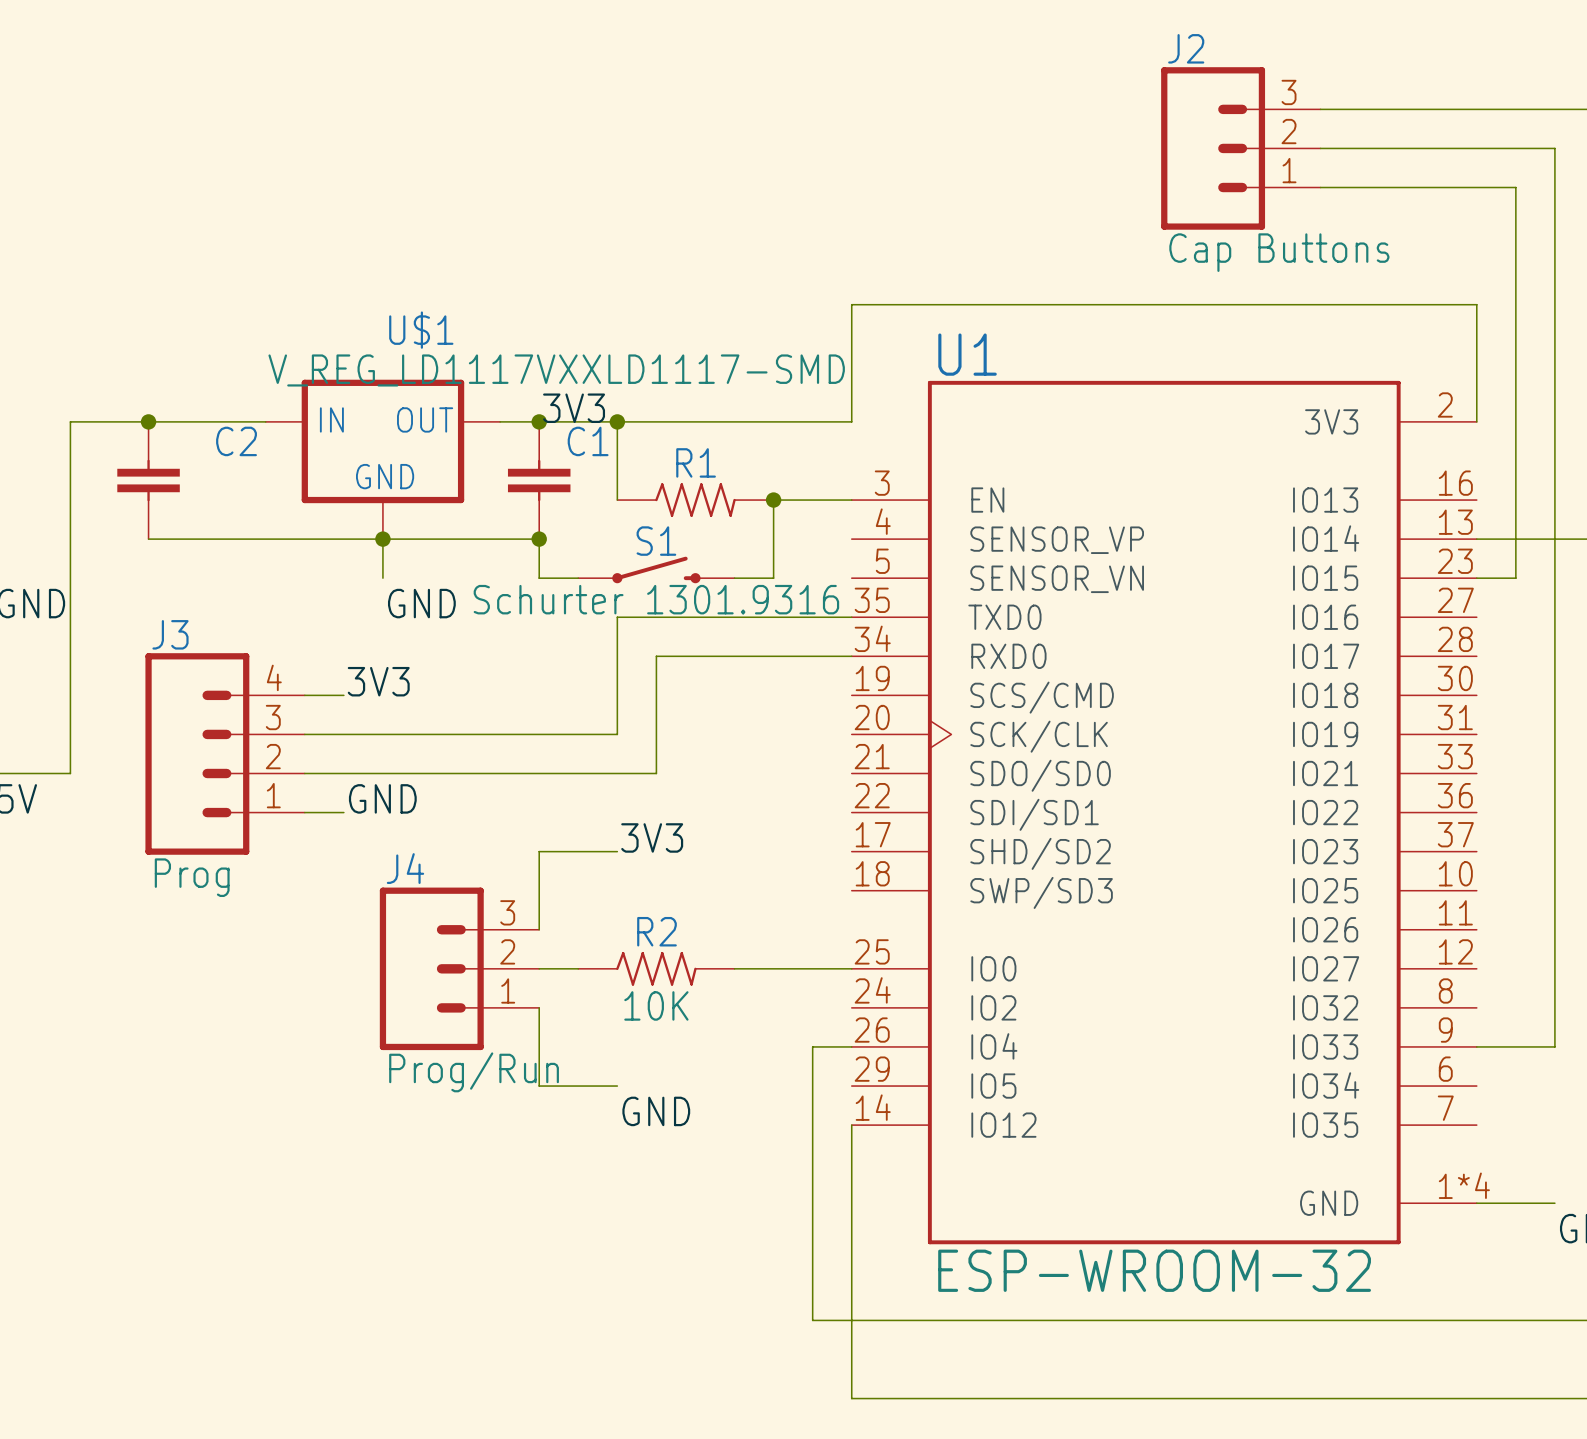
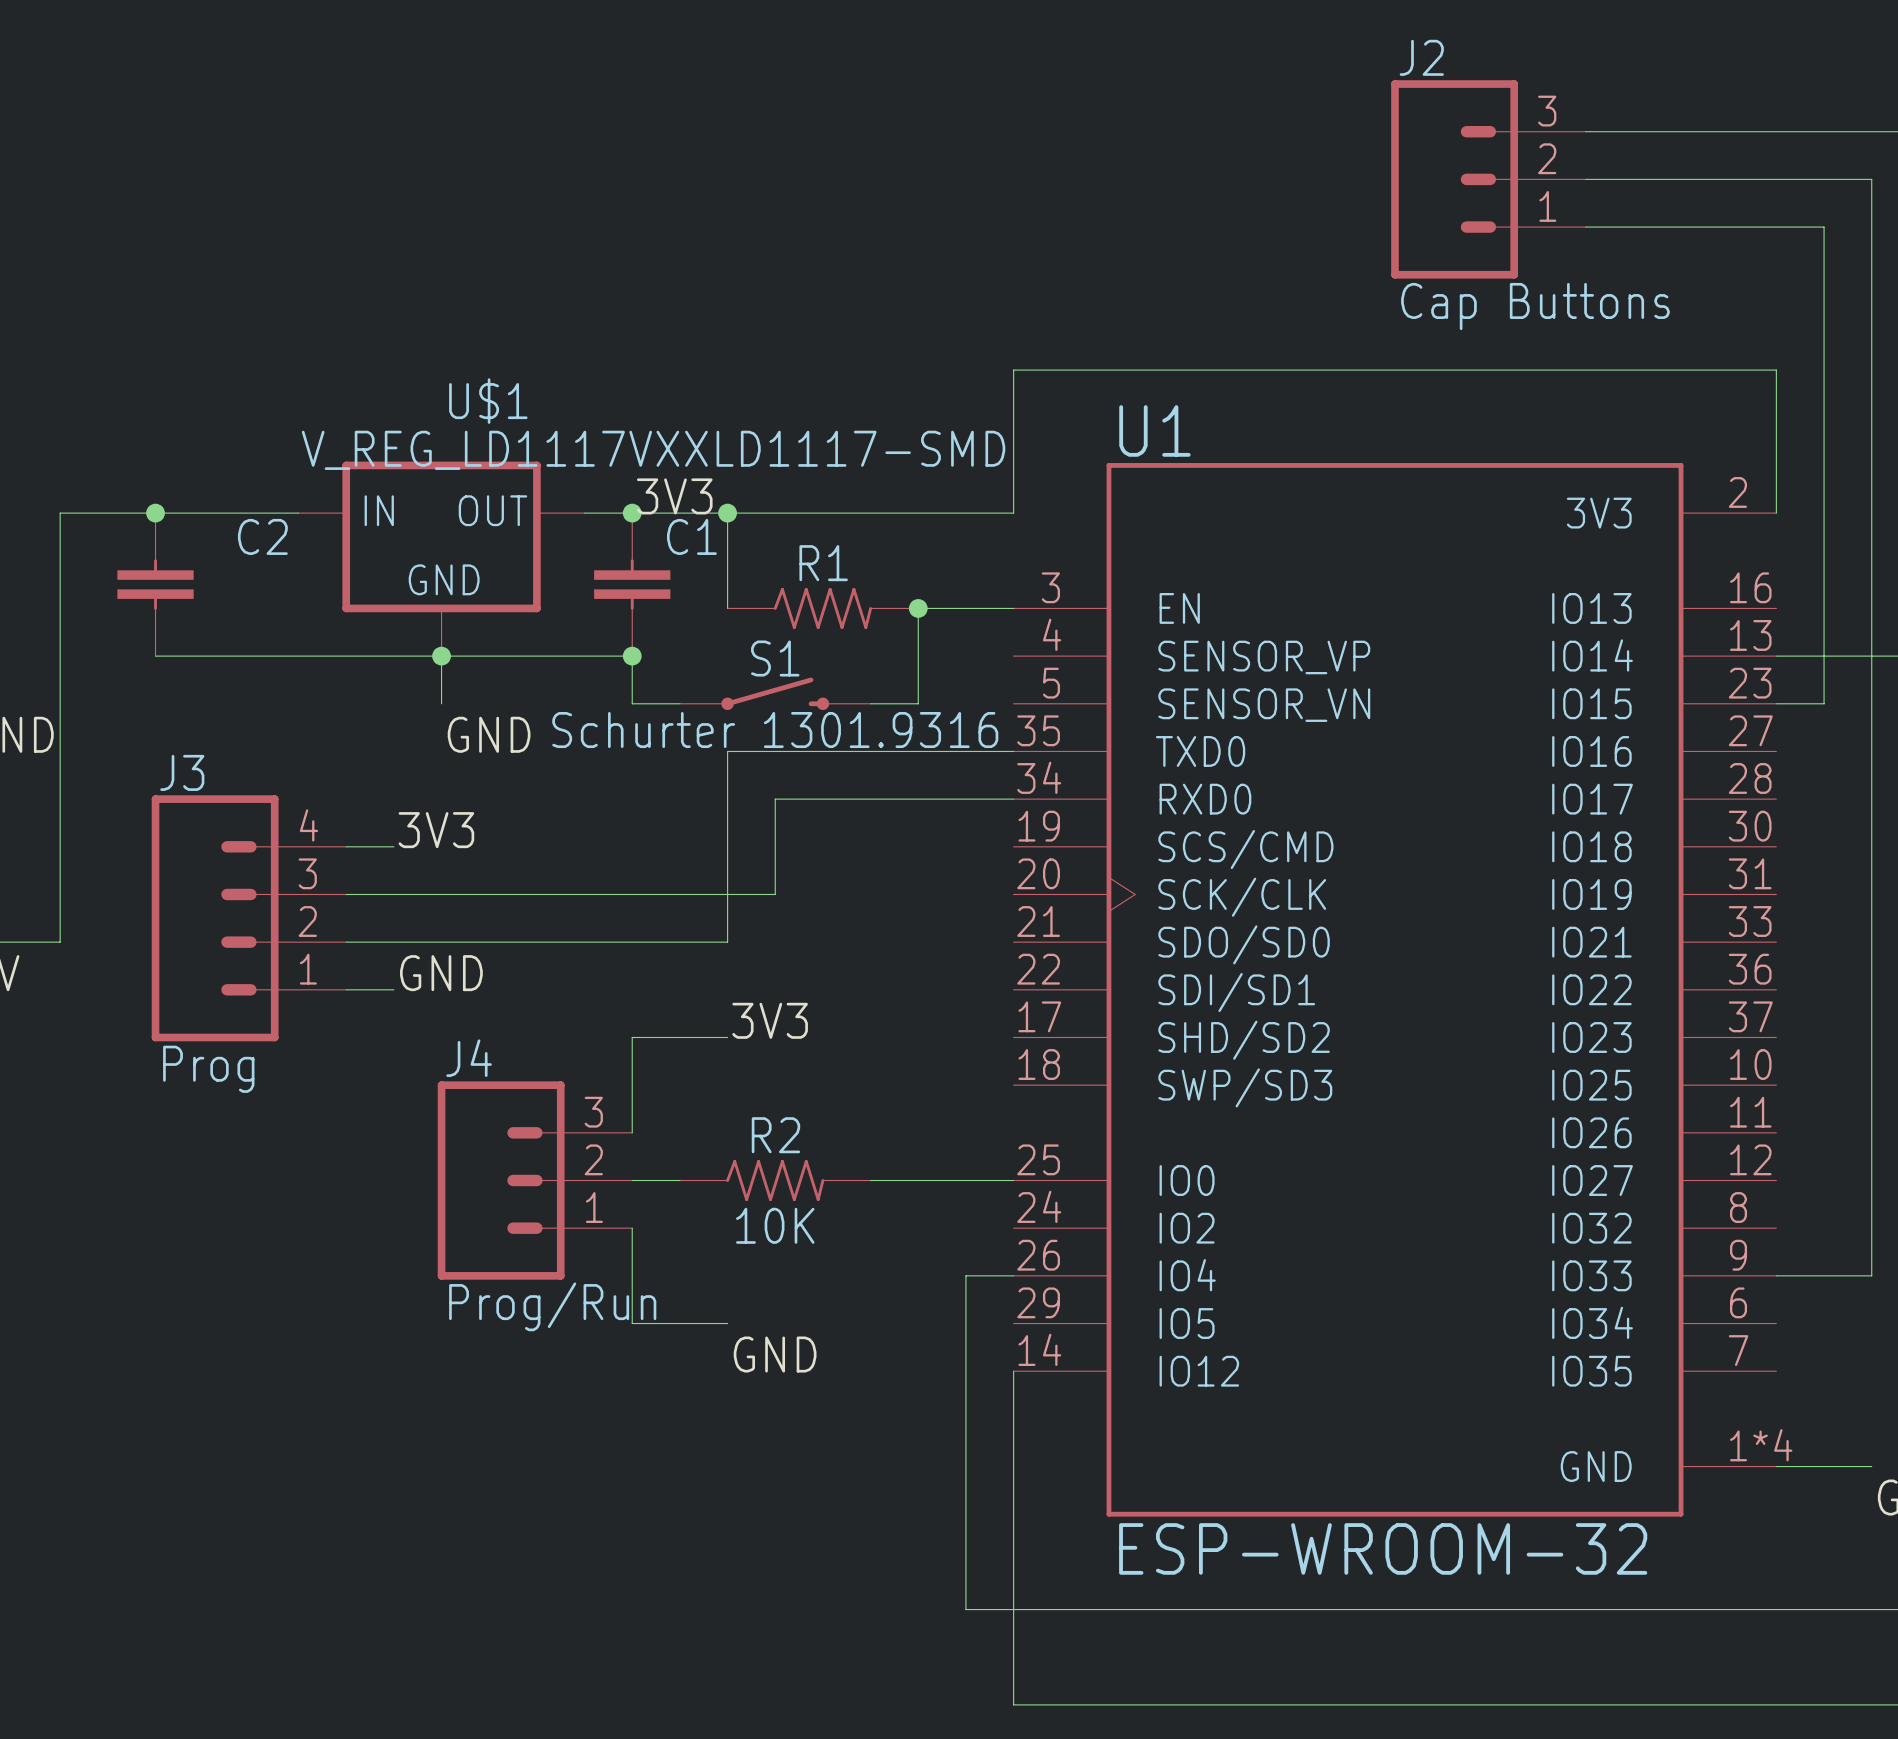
wire: (656, 734) (656, 773) (617, 773) -> (775, 894) (727, 894) (727, 942)

